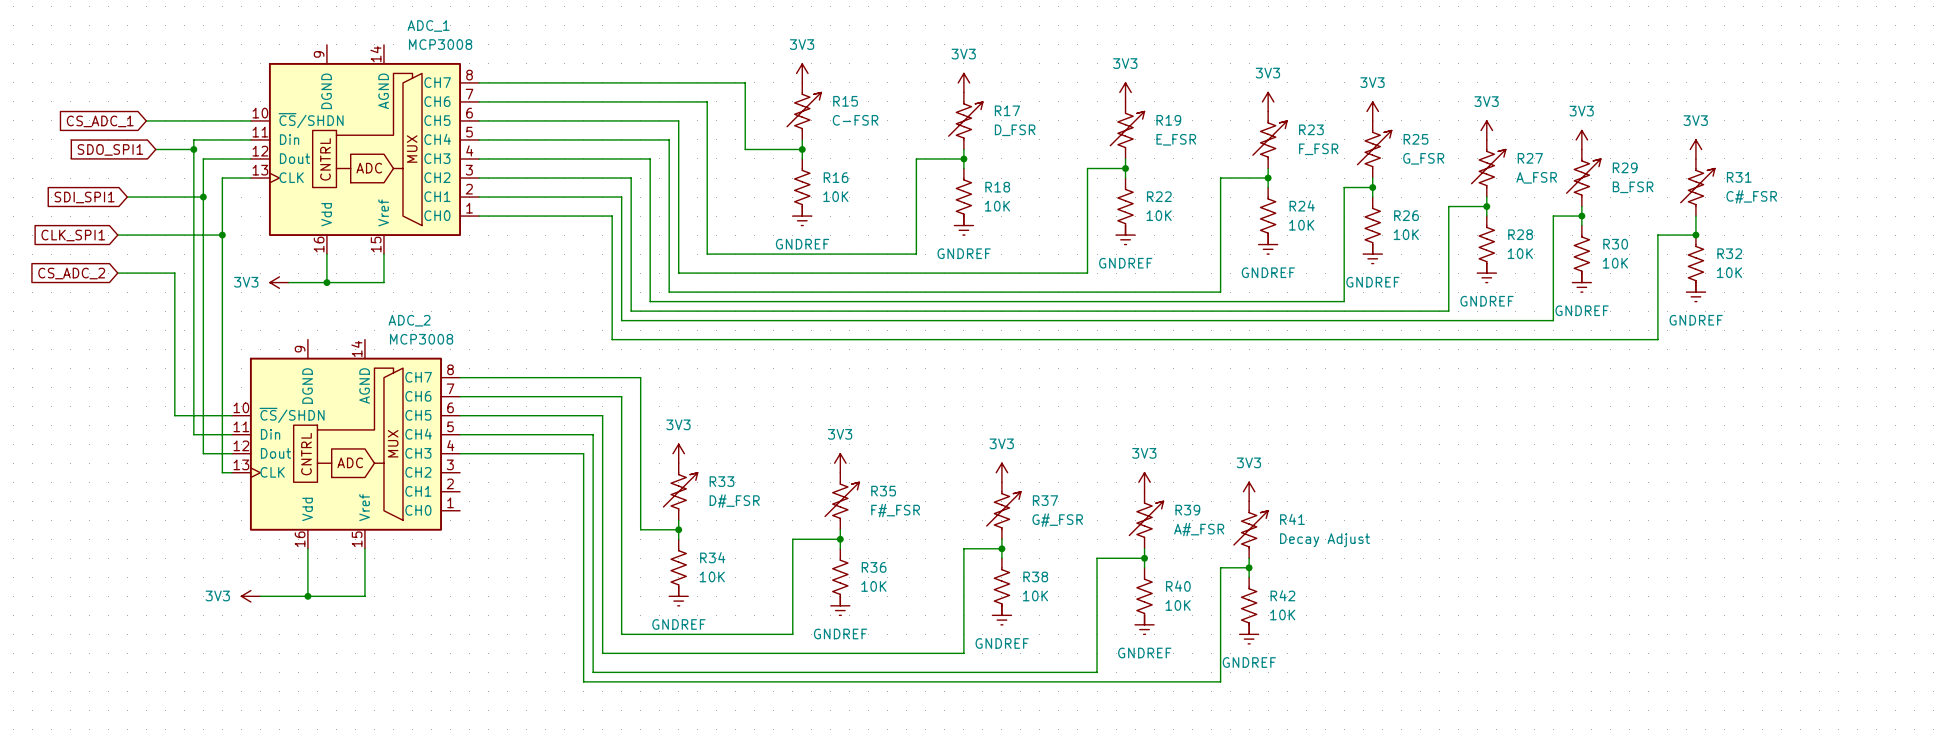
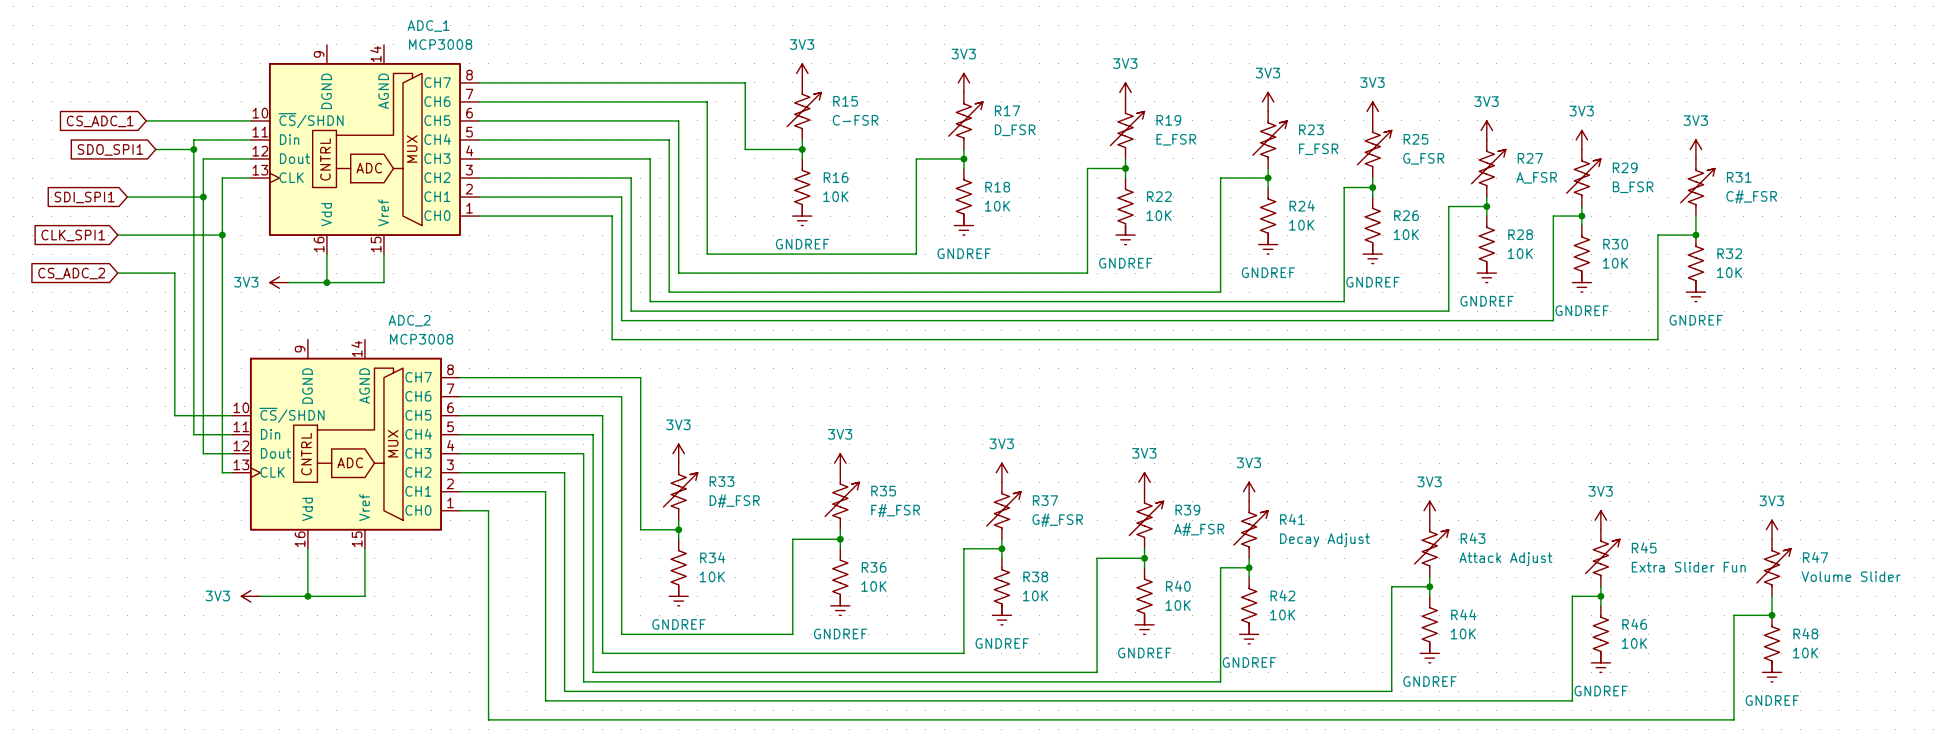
wire: none -> (460, 472) (564, 472) (564, 691) (1391, 691) (1391, 586) (1429, 586)
wire: none -> (460, 491) (545, 491) (545, 700) (1572, 700) (1572, 596) (1600, 596)
wire: none -> (460, 510) (488, 510) (488, 719) (1733, 719) (1733, 615) (1772, 615) (1772, 596)
power symbol: none -> 3V3 (1429, 510)
power symbol: none -> 3V3 (1600, 520)
power symbol: none -> 3V3 (1772, 529)
R43: none -> Attack Adjust (1431, 548)
R45: none -> Extra Slider Fun (1602, 558)
R47: none -> Volume Slider (1773, 567)
wire: none -> (1429, 577) (1429, 596)
junction: none -> (1429, 586)
wire: none -> (1600, 586) (1600, 605)
junction: none -> (1600, 596)
junction: none -> (1772, 615)
R44: none -> 10K (1429, 624)
R46: none -> 10K (1600, 634)
R48: none -> 10K (1772, 643)
power symbol: none -> GNDREF (1429, 653)
power symbol: none -> GNDREF (1600, 662)
power symbol: none -> GNDREF (1772, 672)

